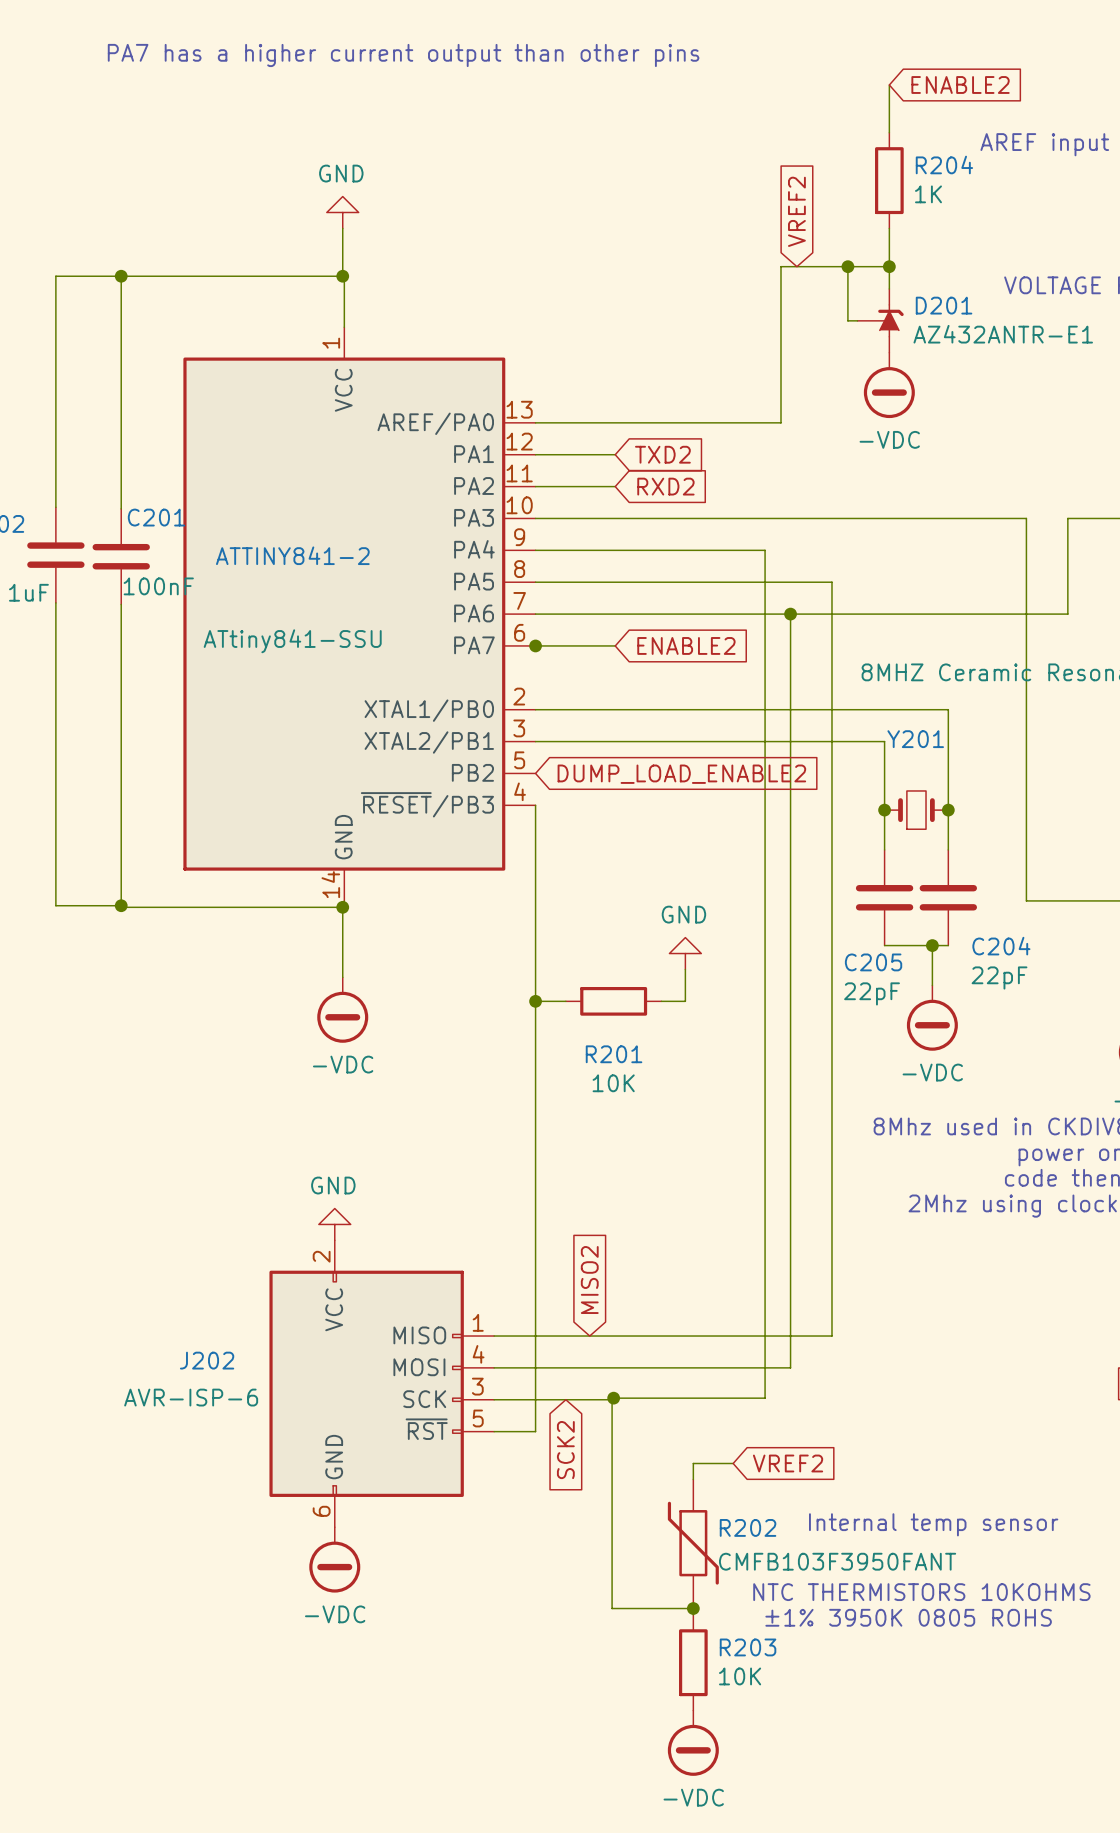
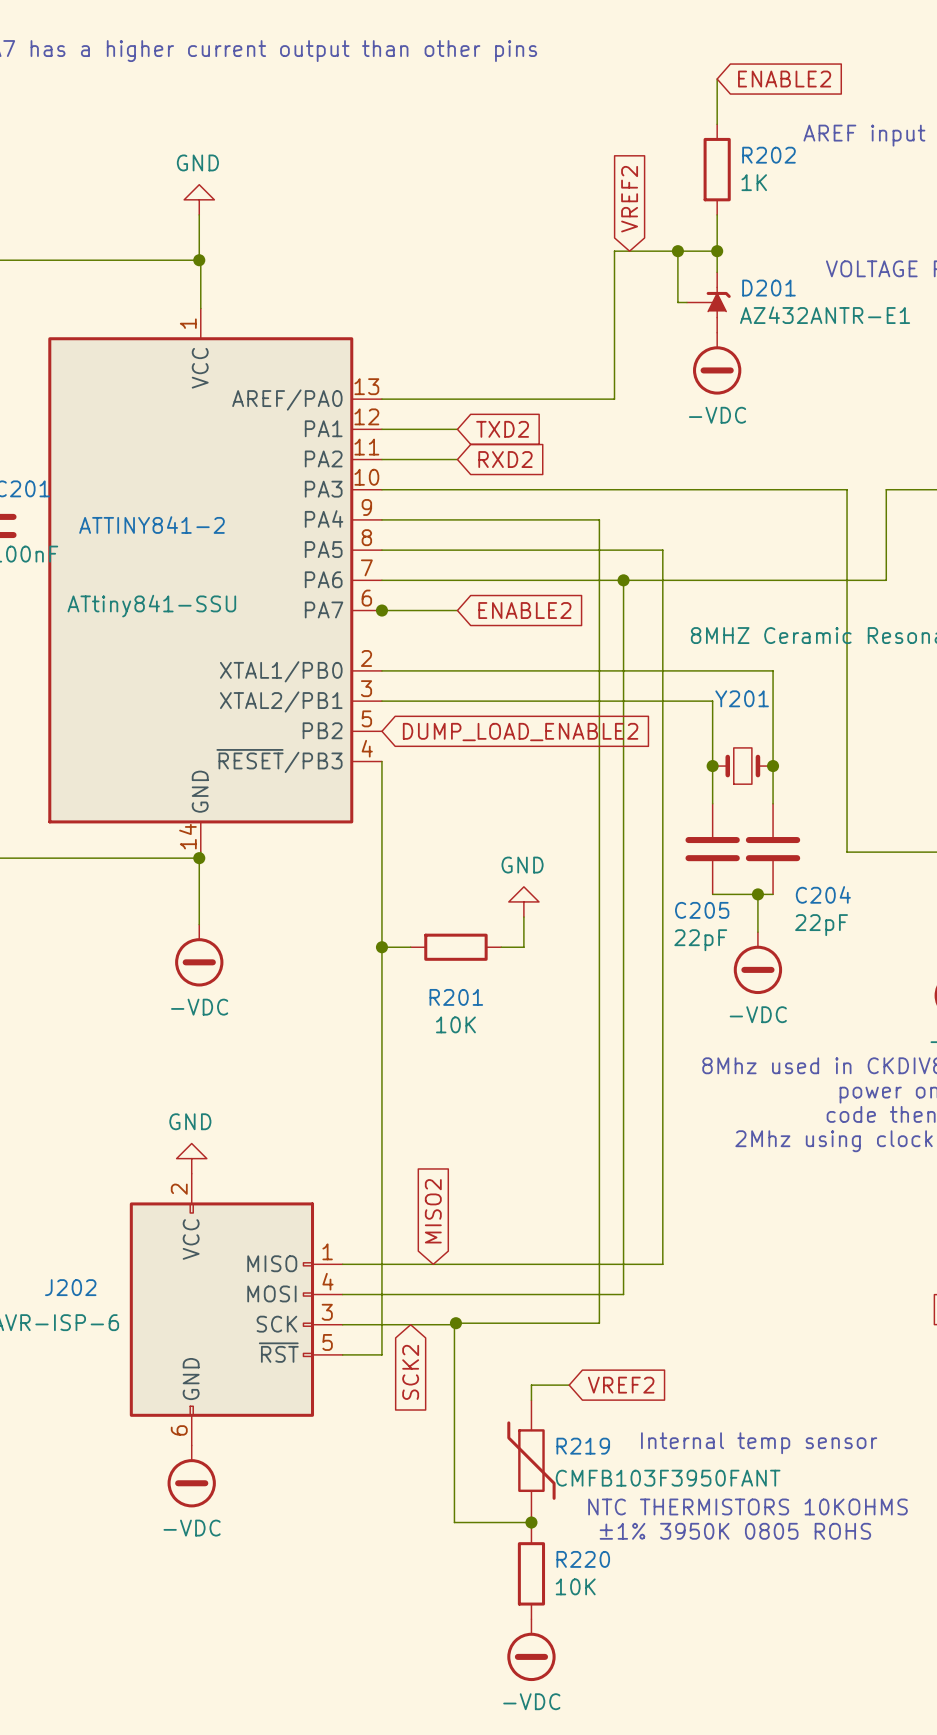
R204 name: R204 (944, 164) -> R202 (768, 155)
R202 name: R202 (748, 1527) -> R219 (583, 1446)
R203 name: R203 (748, 1647) -> R220 (583, 1559)

